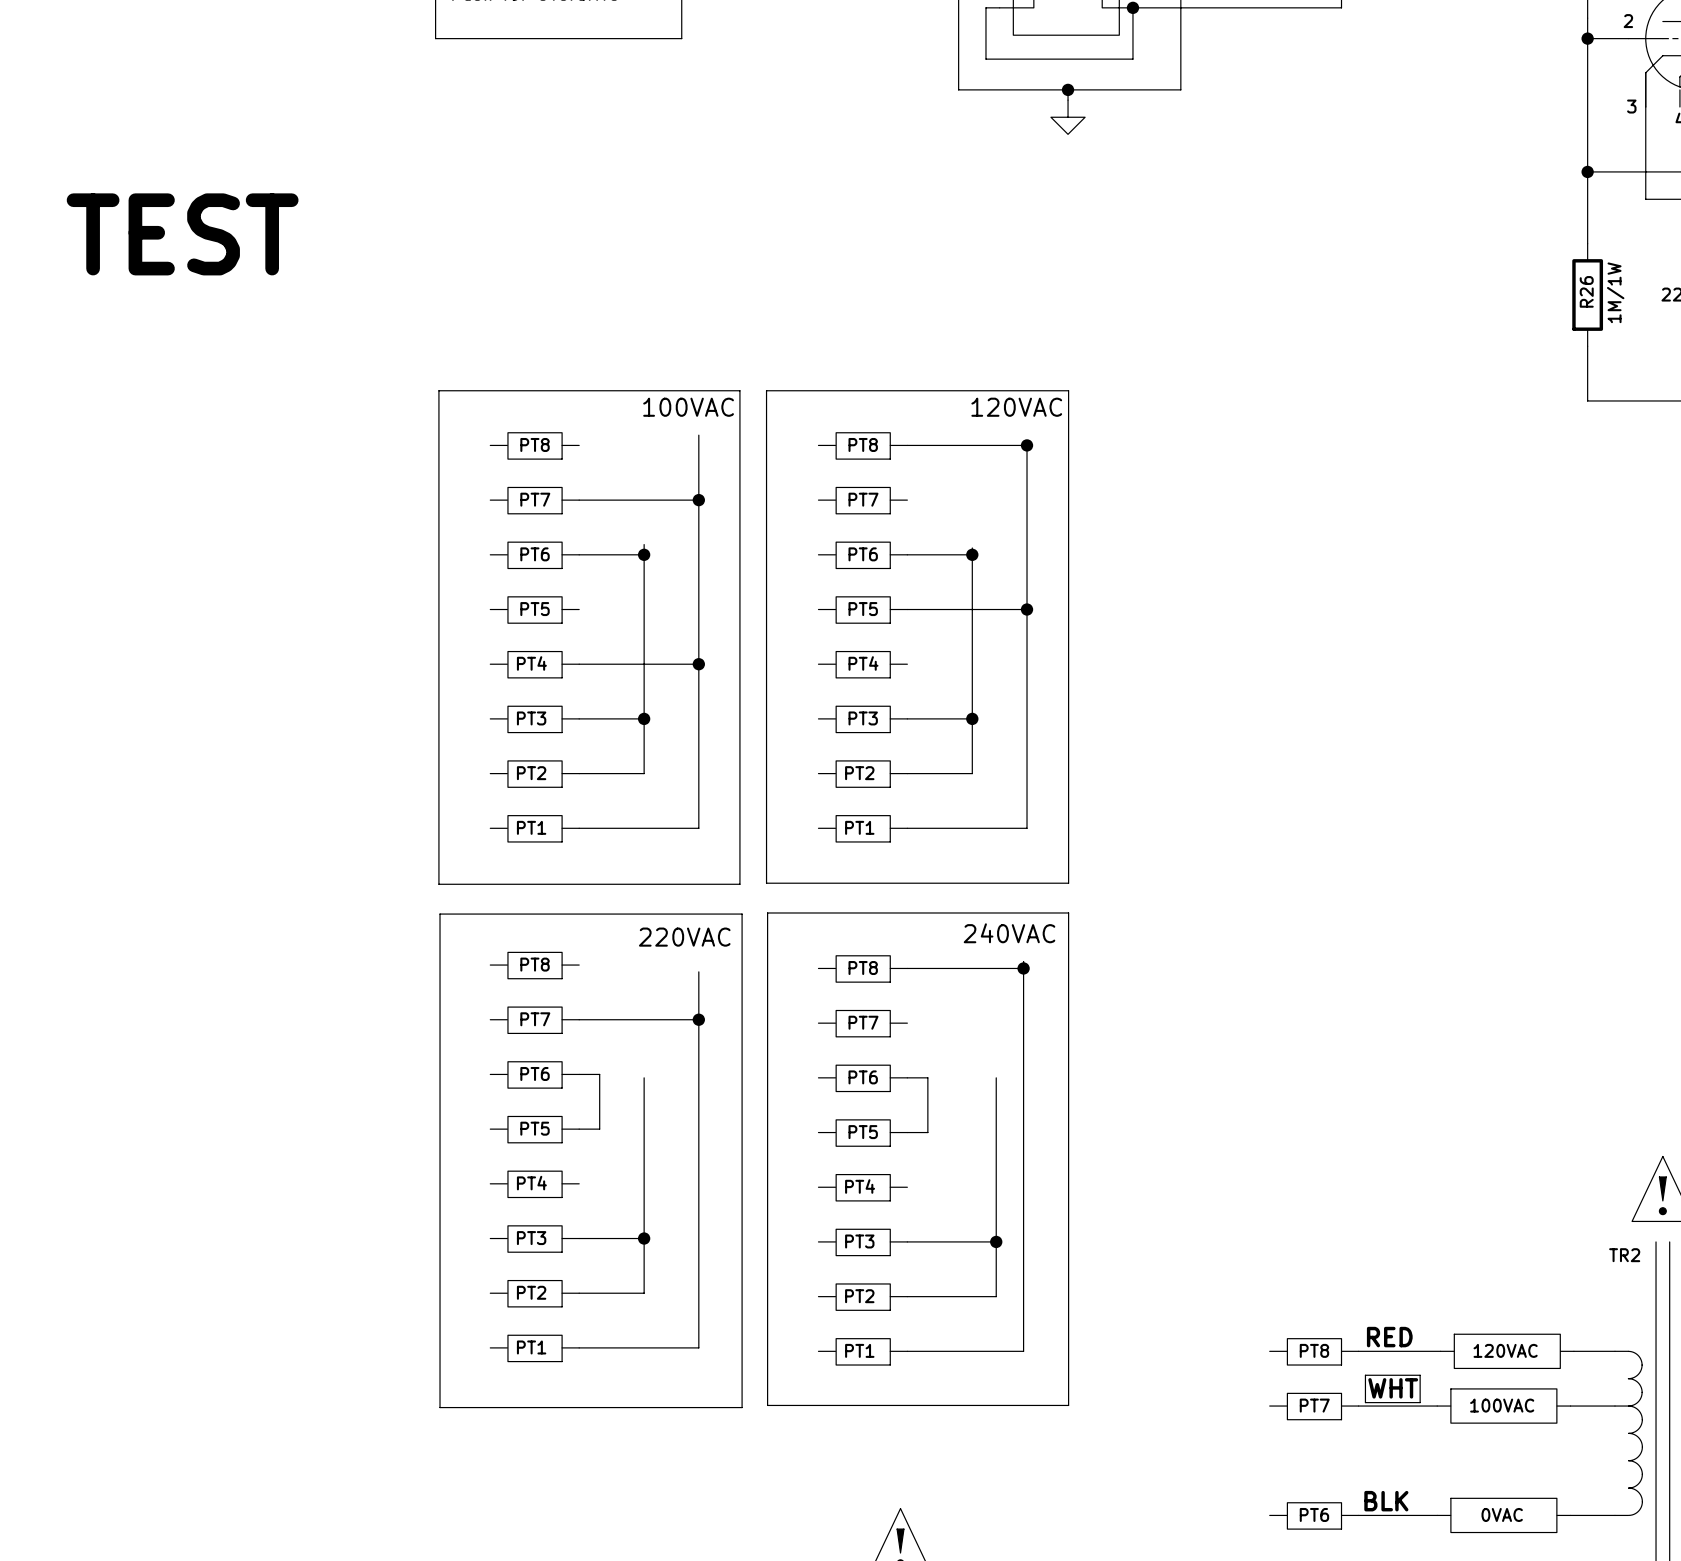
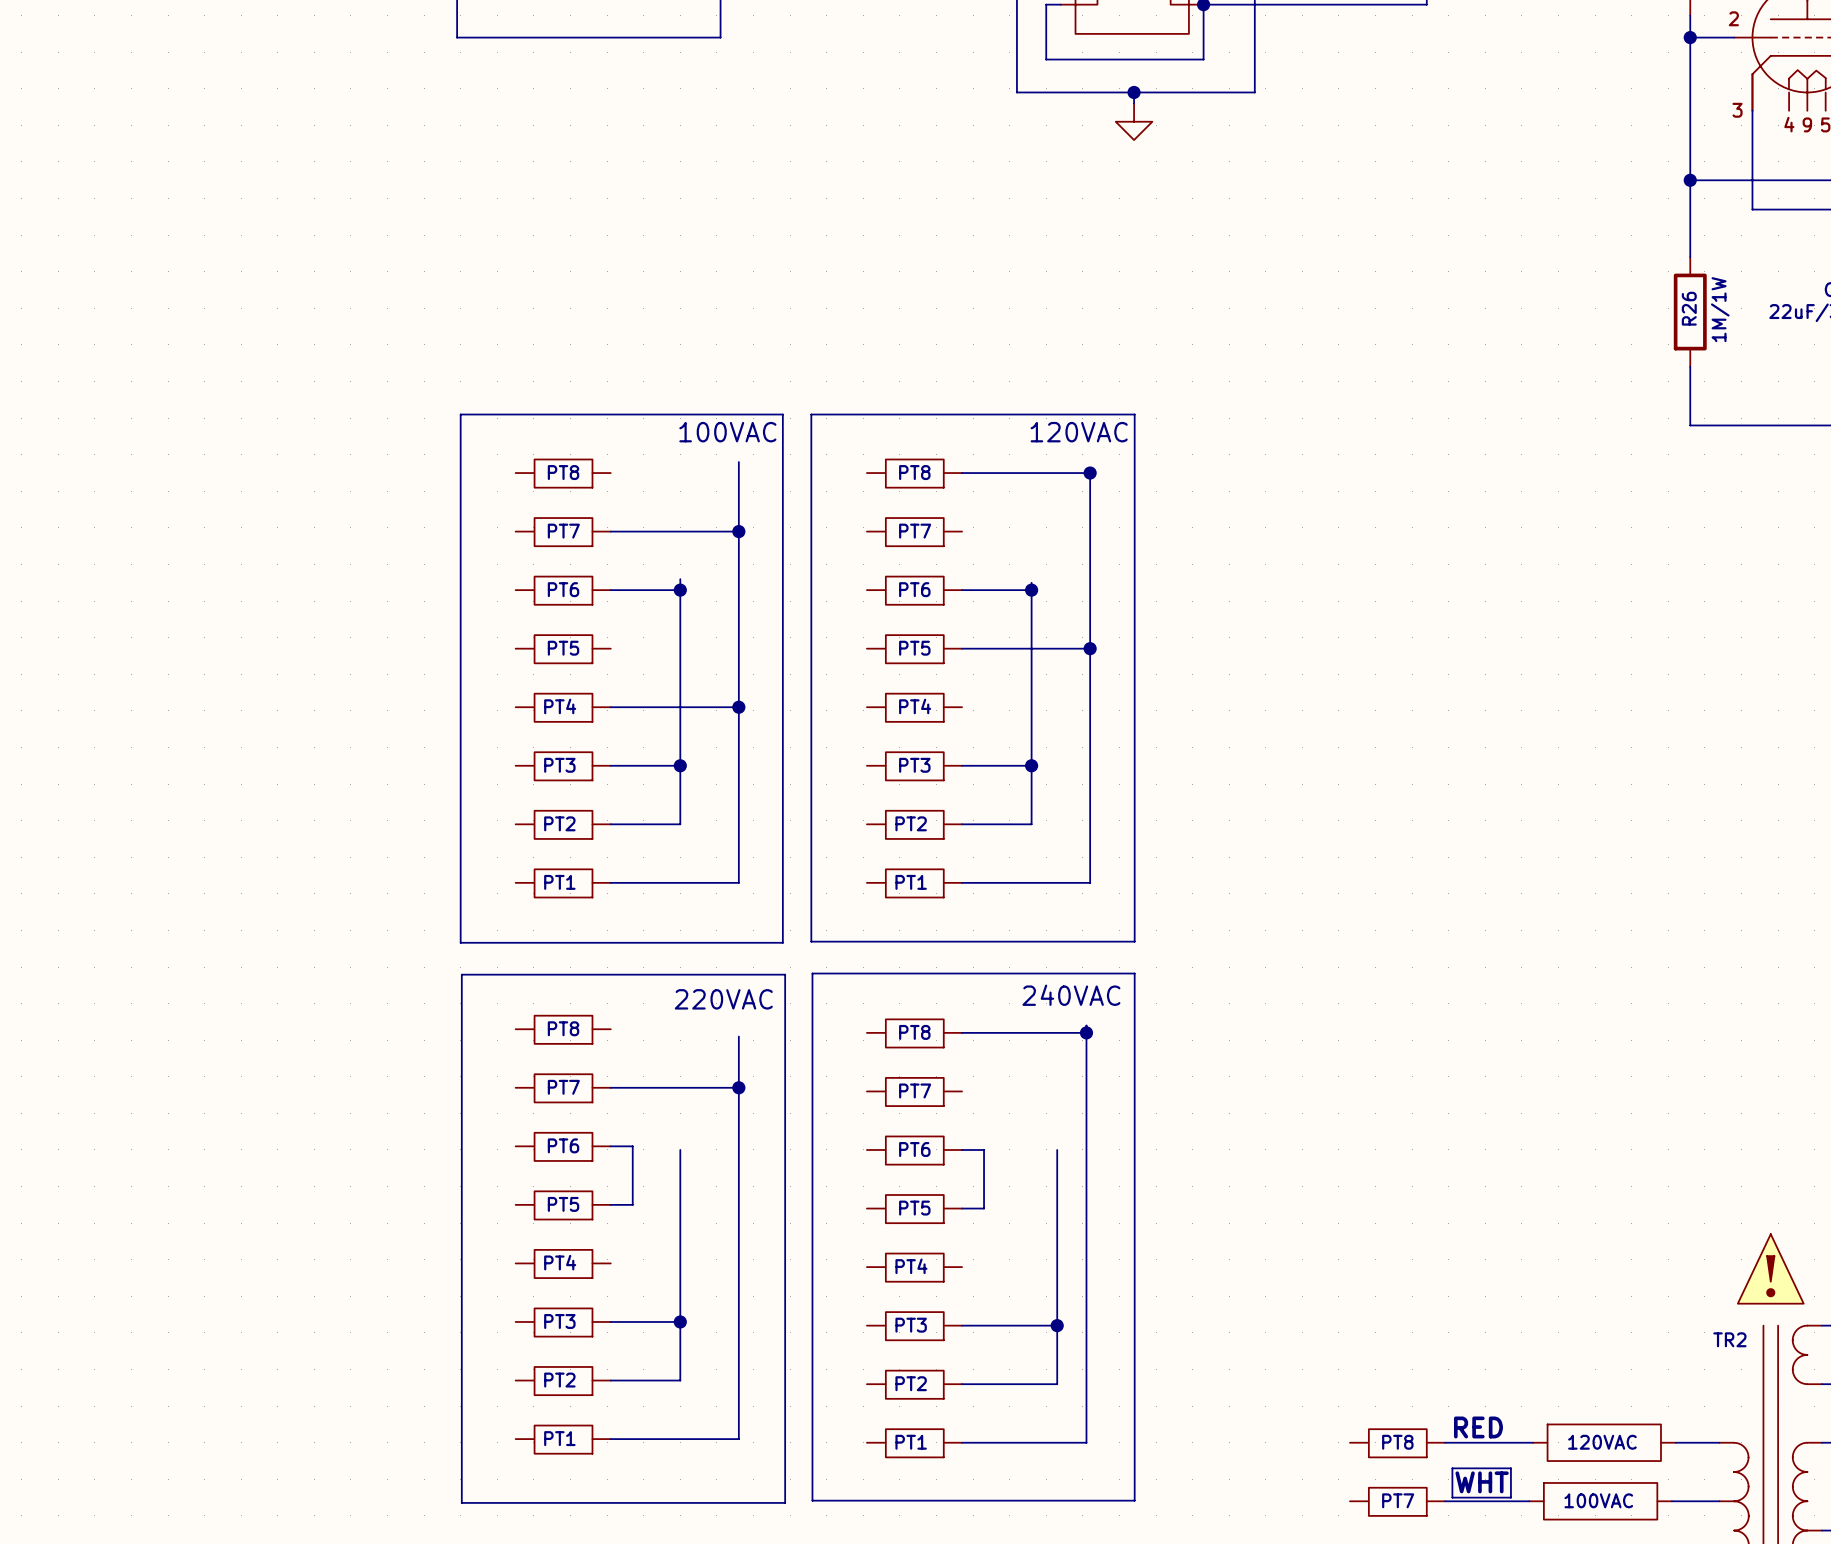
text: TEST (182, 234) -> none

